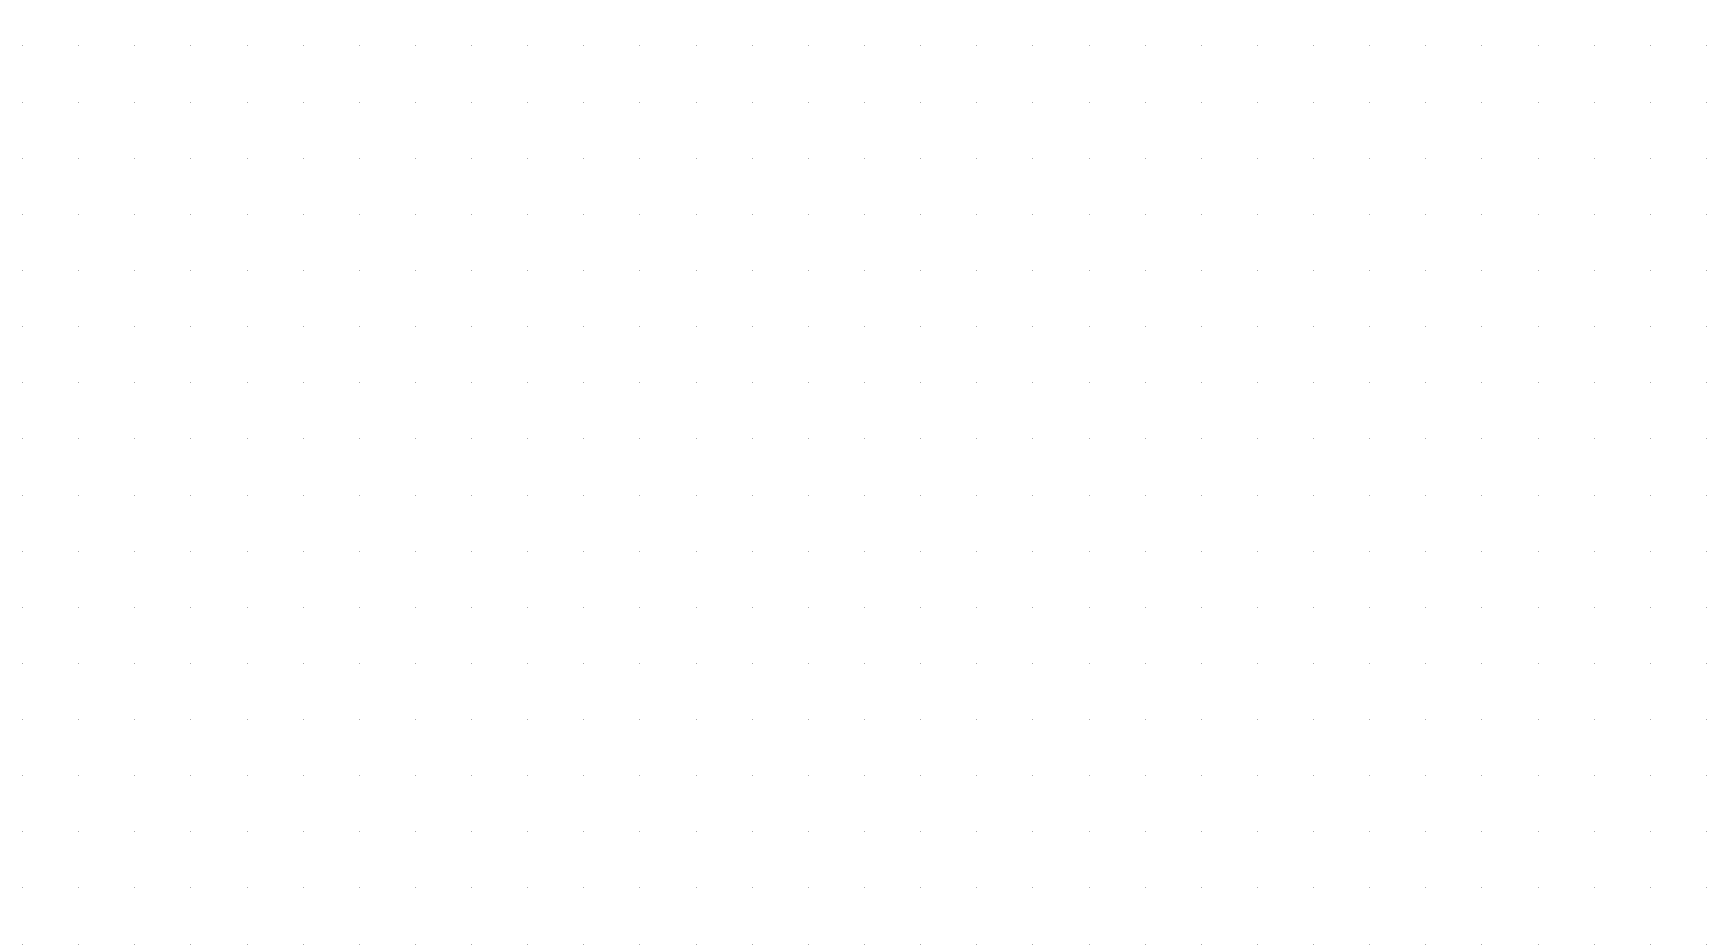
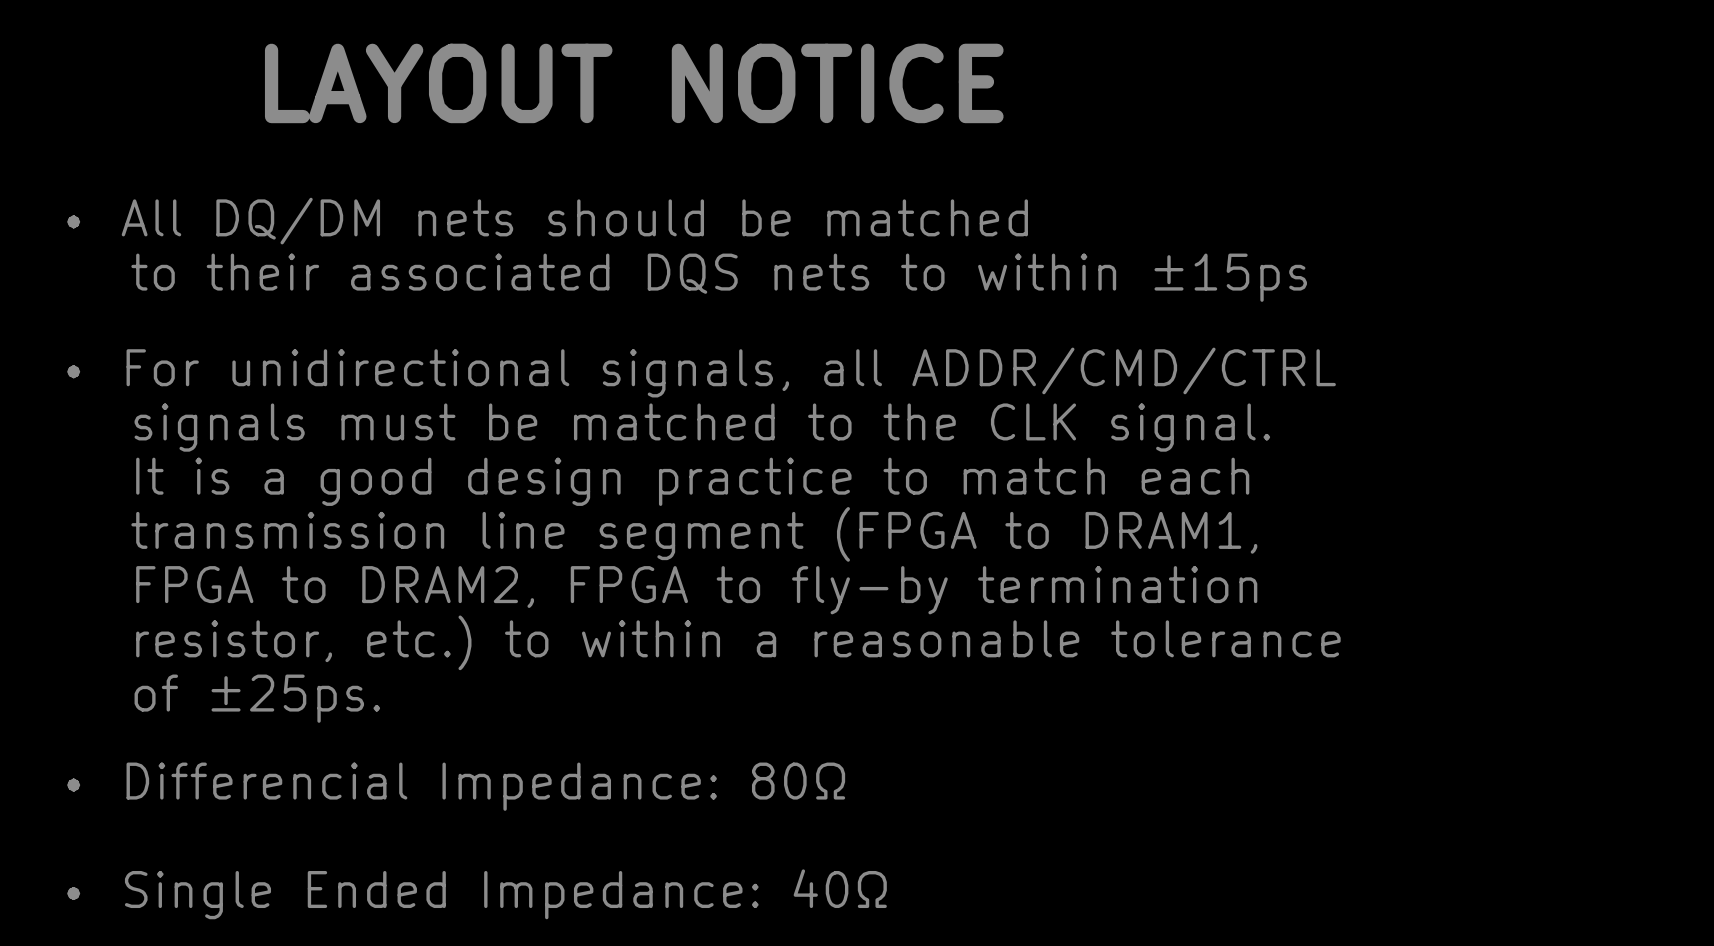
text: none -> LAYOUT NOTICE (634, 83)
text: none -> • All DQ/DM nets should be matched (547, 221)
text: none -> to their associated DQS nets to within ±15ps (719, 277)
text: none -> • For unidirectional signals, all ADDR/CMD/CTRL (701, 372)
text: none -> signals must be matched to the CLK signal. (702, 427)
text: none -> It is a good design practice to match each (692, 481)
text: none -> transmission line segment (FPGA to DRAM1, (694, 534)
text: none -> FPGA to DRAM2, FPGA to fly-by termination (696, 590)
text: none -> resistor, etc.) to within a reasonable tolerance (738, 642)
text: none -> of ±25ps. (257, 698)
text: none -> • Differencial Impedance: 80Ω (456, 786)
text: none -> • Single Ended Impedance: 40Ω (477, 894)

